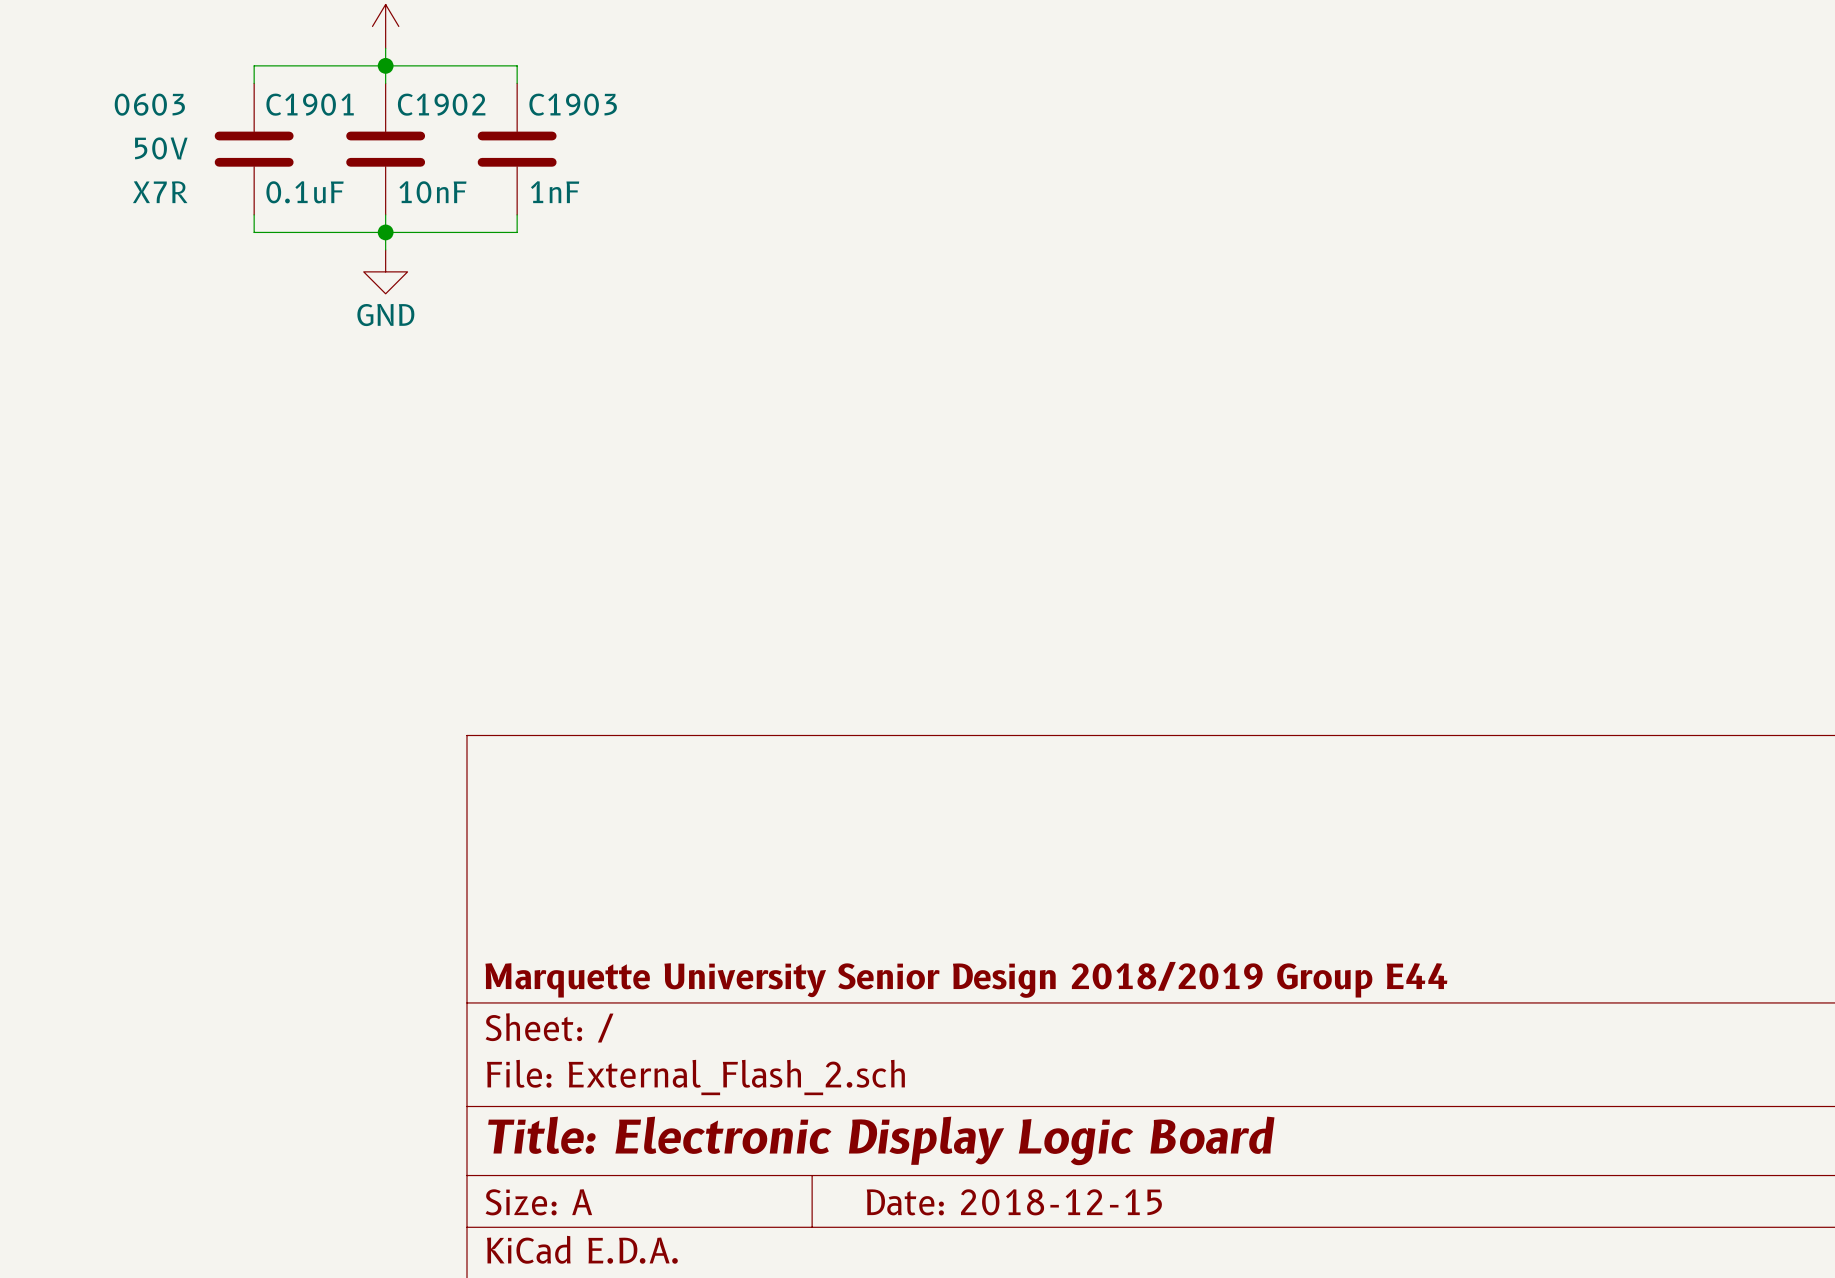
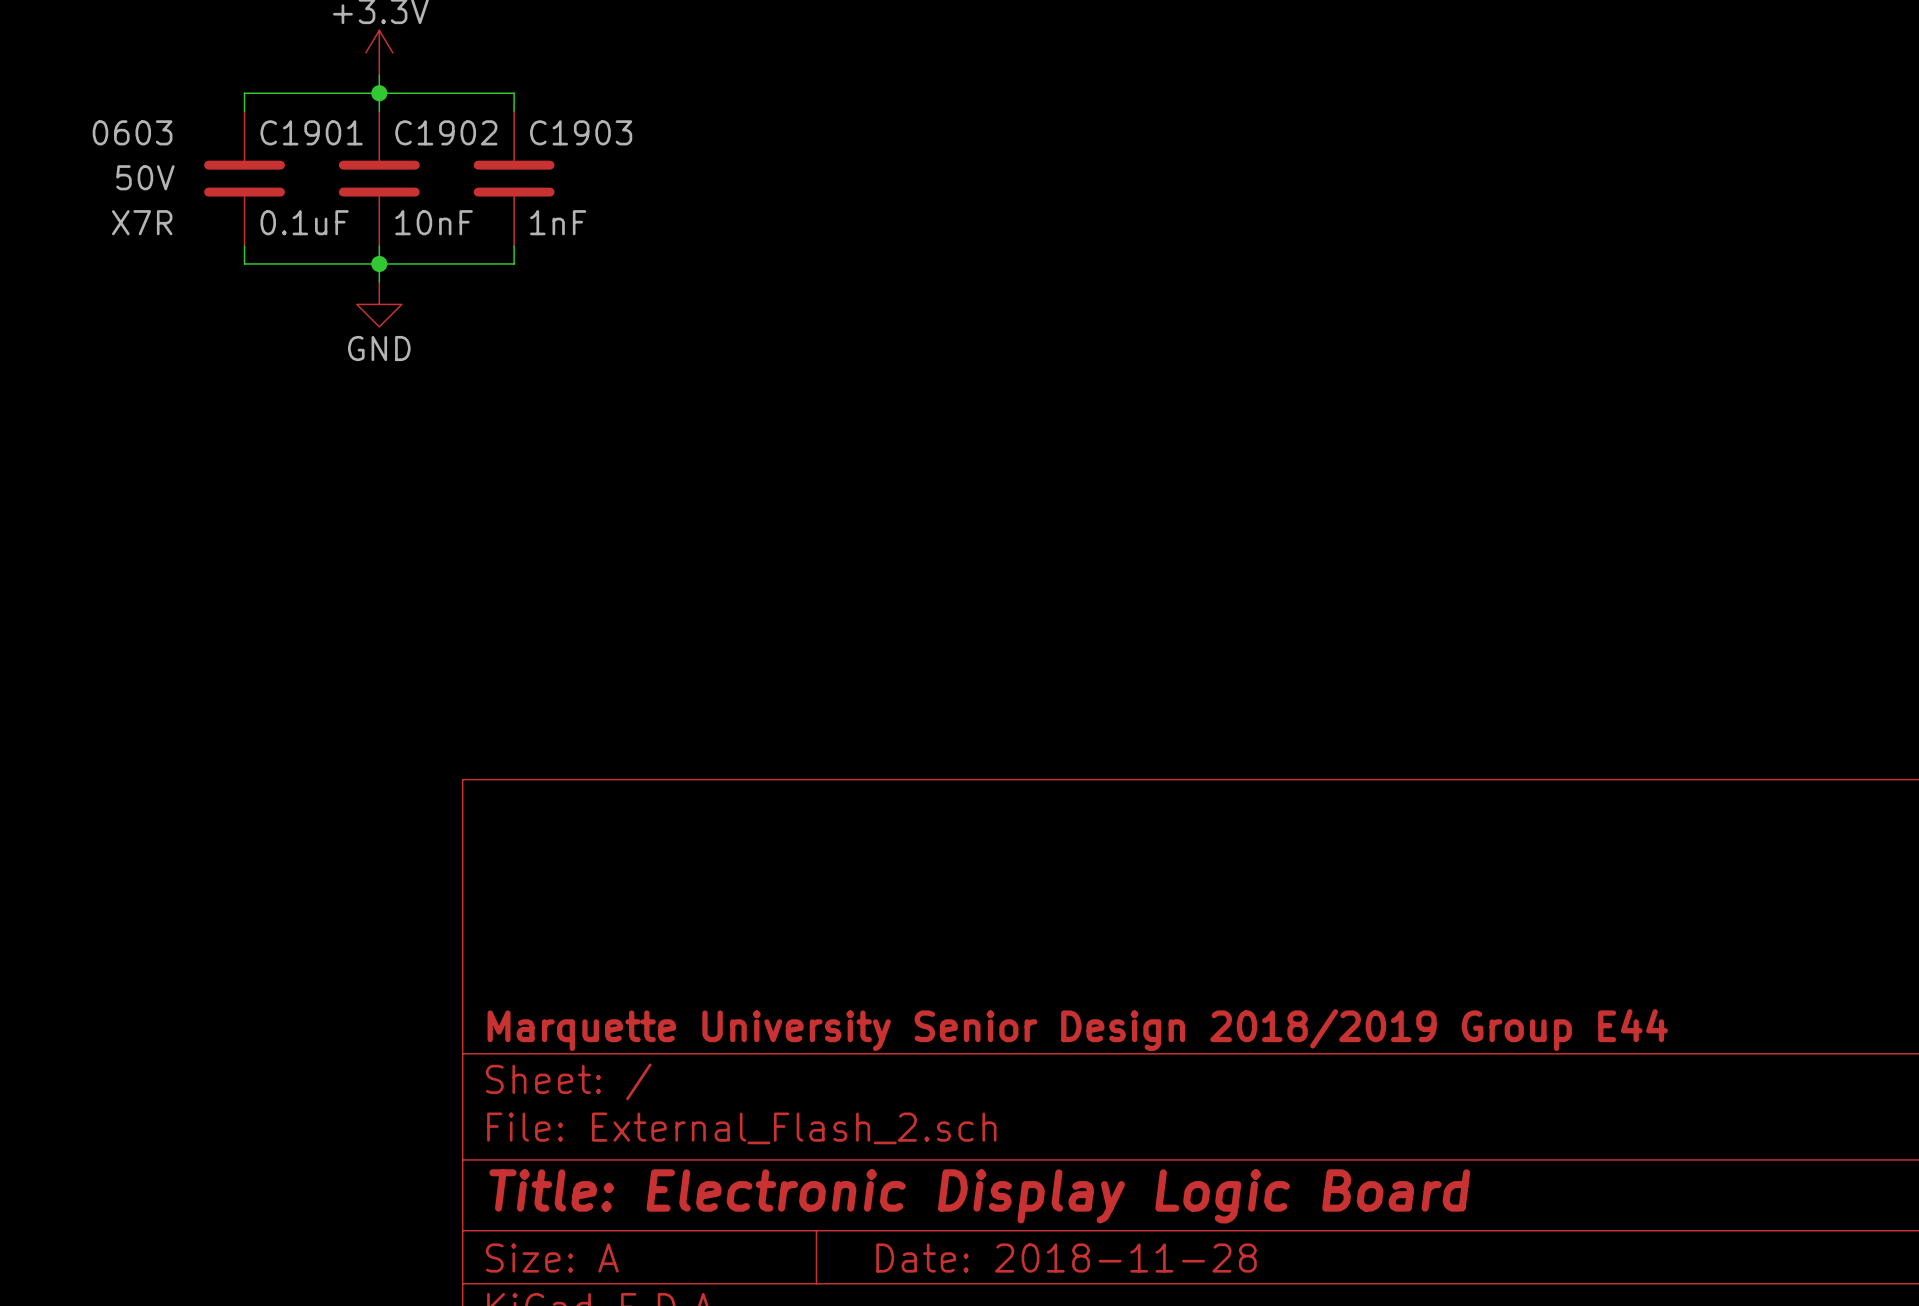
title block: Date: 2018-12-15 (1014, 1202) -> Date: 2018-11-28 (1066, 1258)

